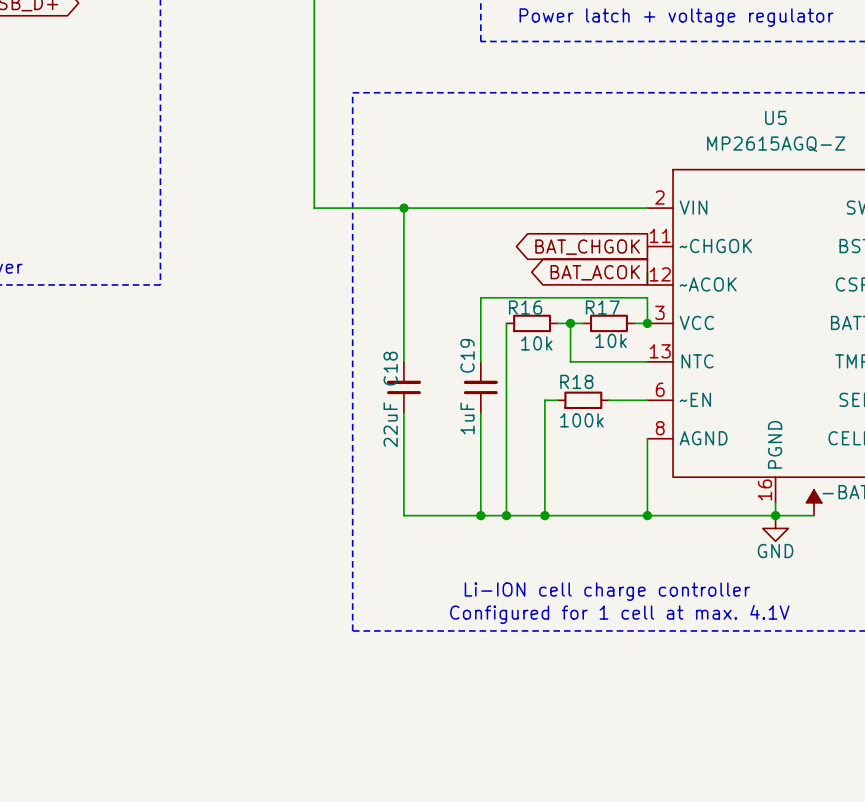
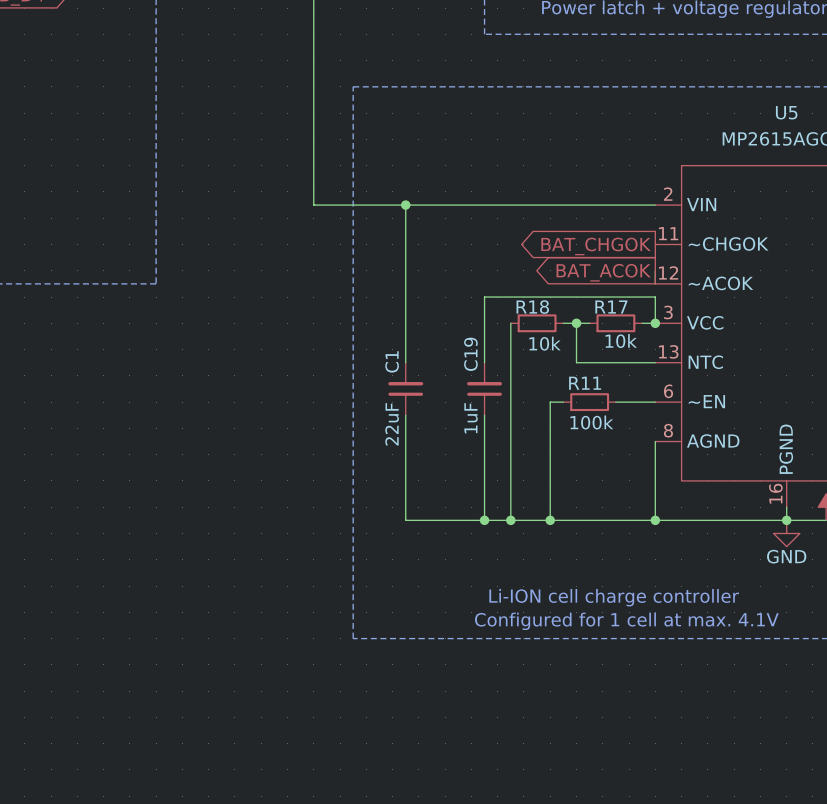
R16 name: R16 (525, 307) -> R18 (532, 307)
C18 name: C18 (390, 368) -> C1 (392, 361)
R18 name: R18 (576, 381) -> R11 (585, 383)

